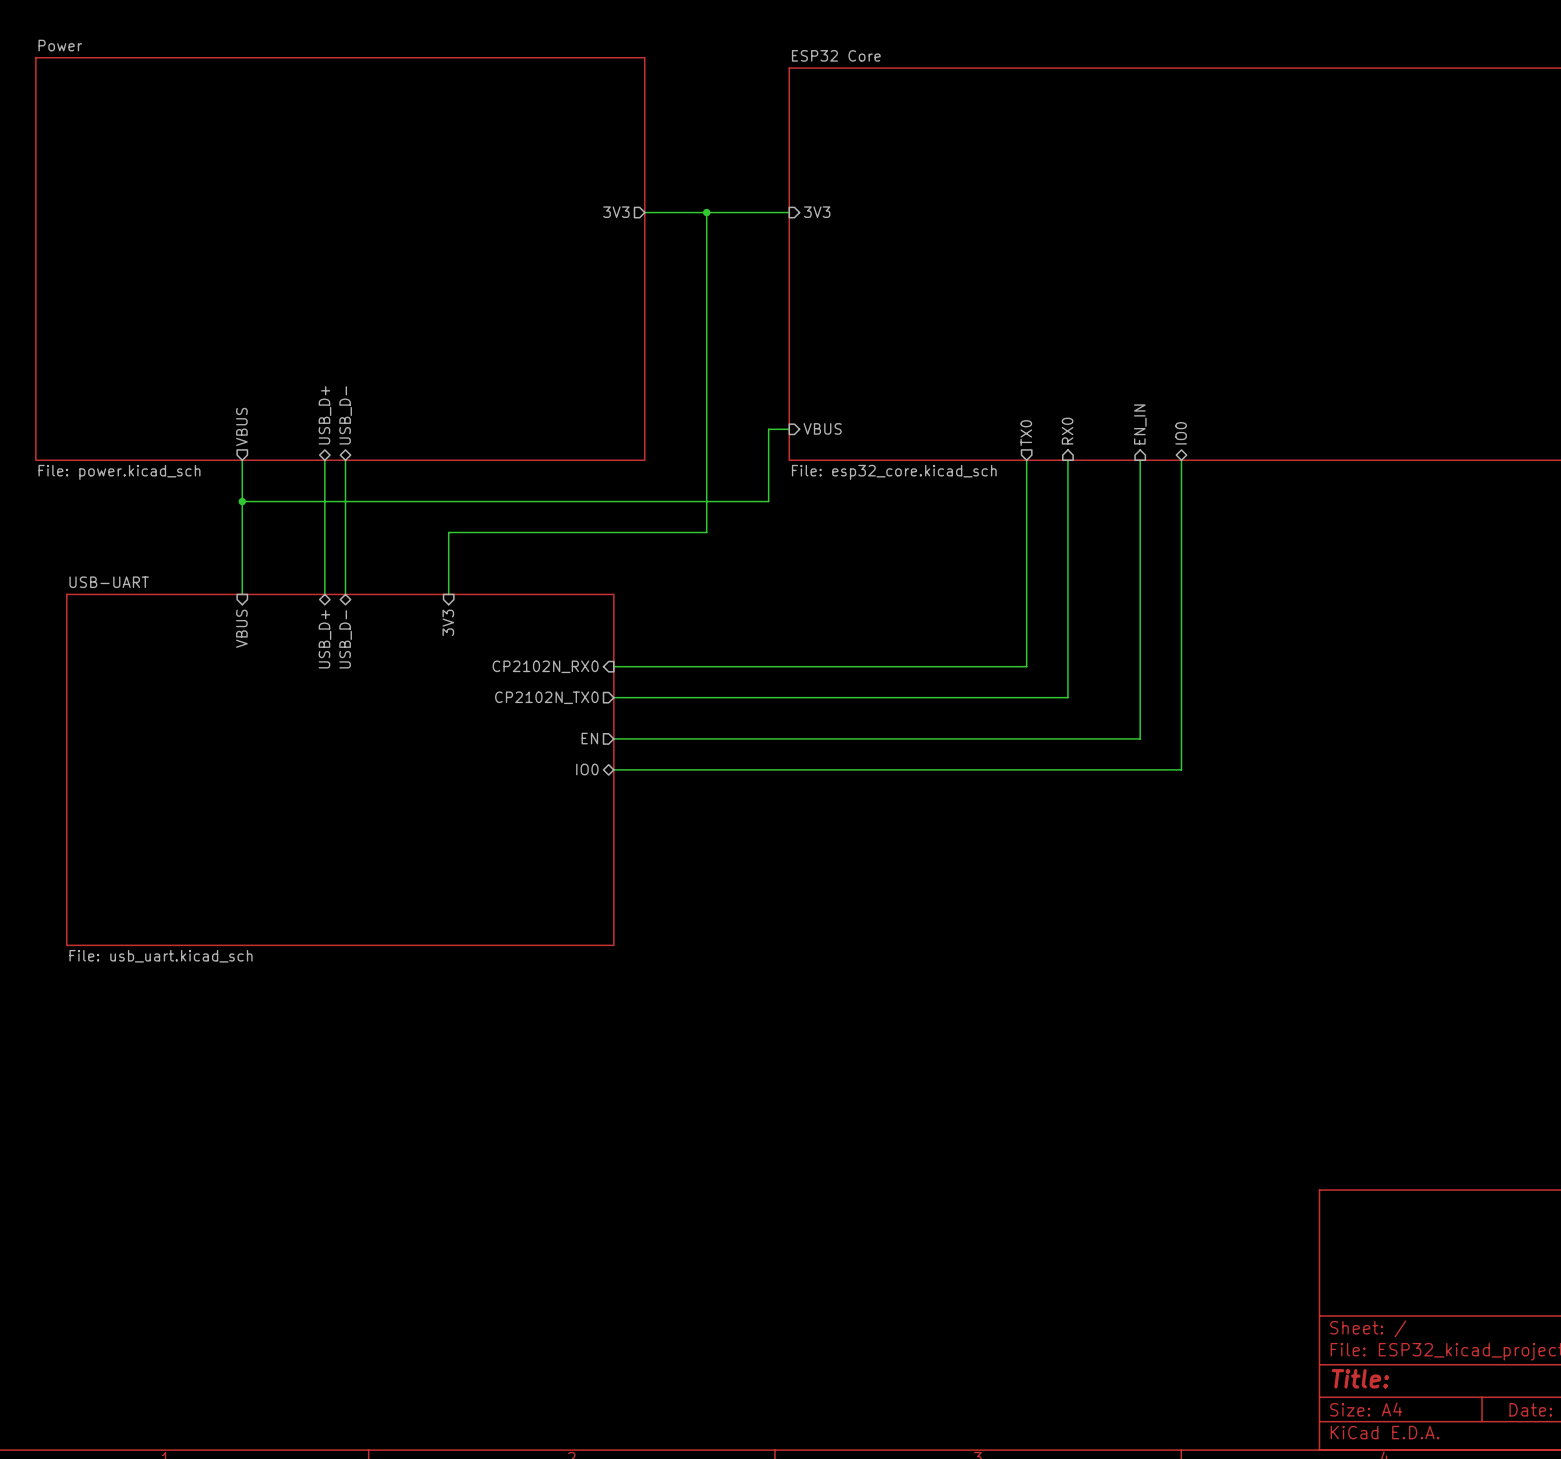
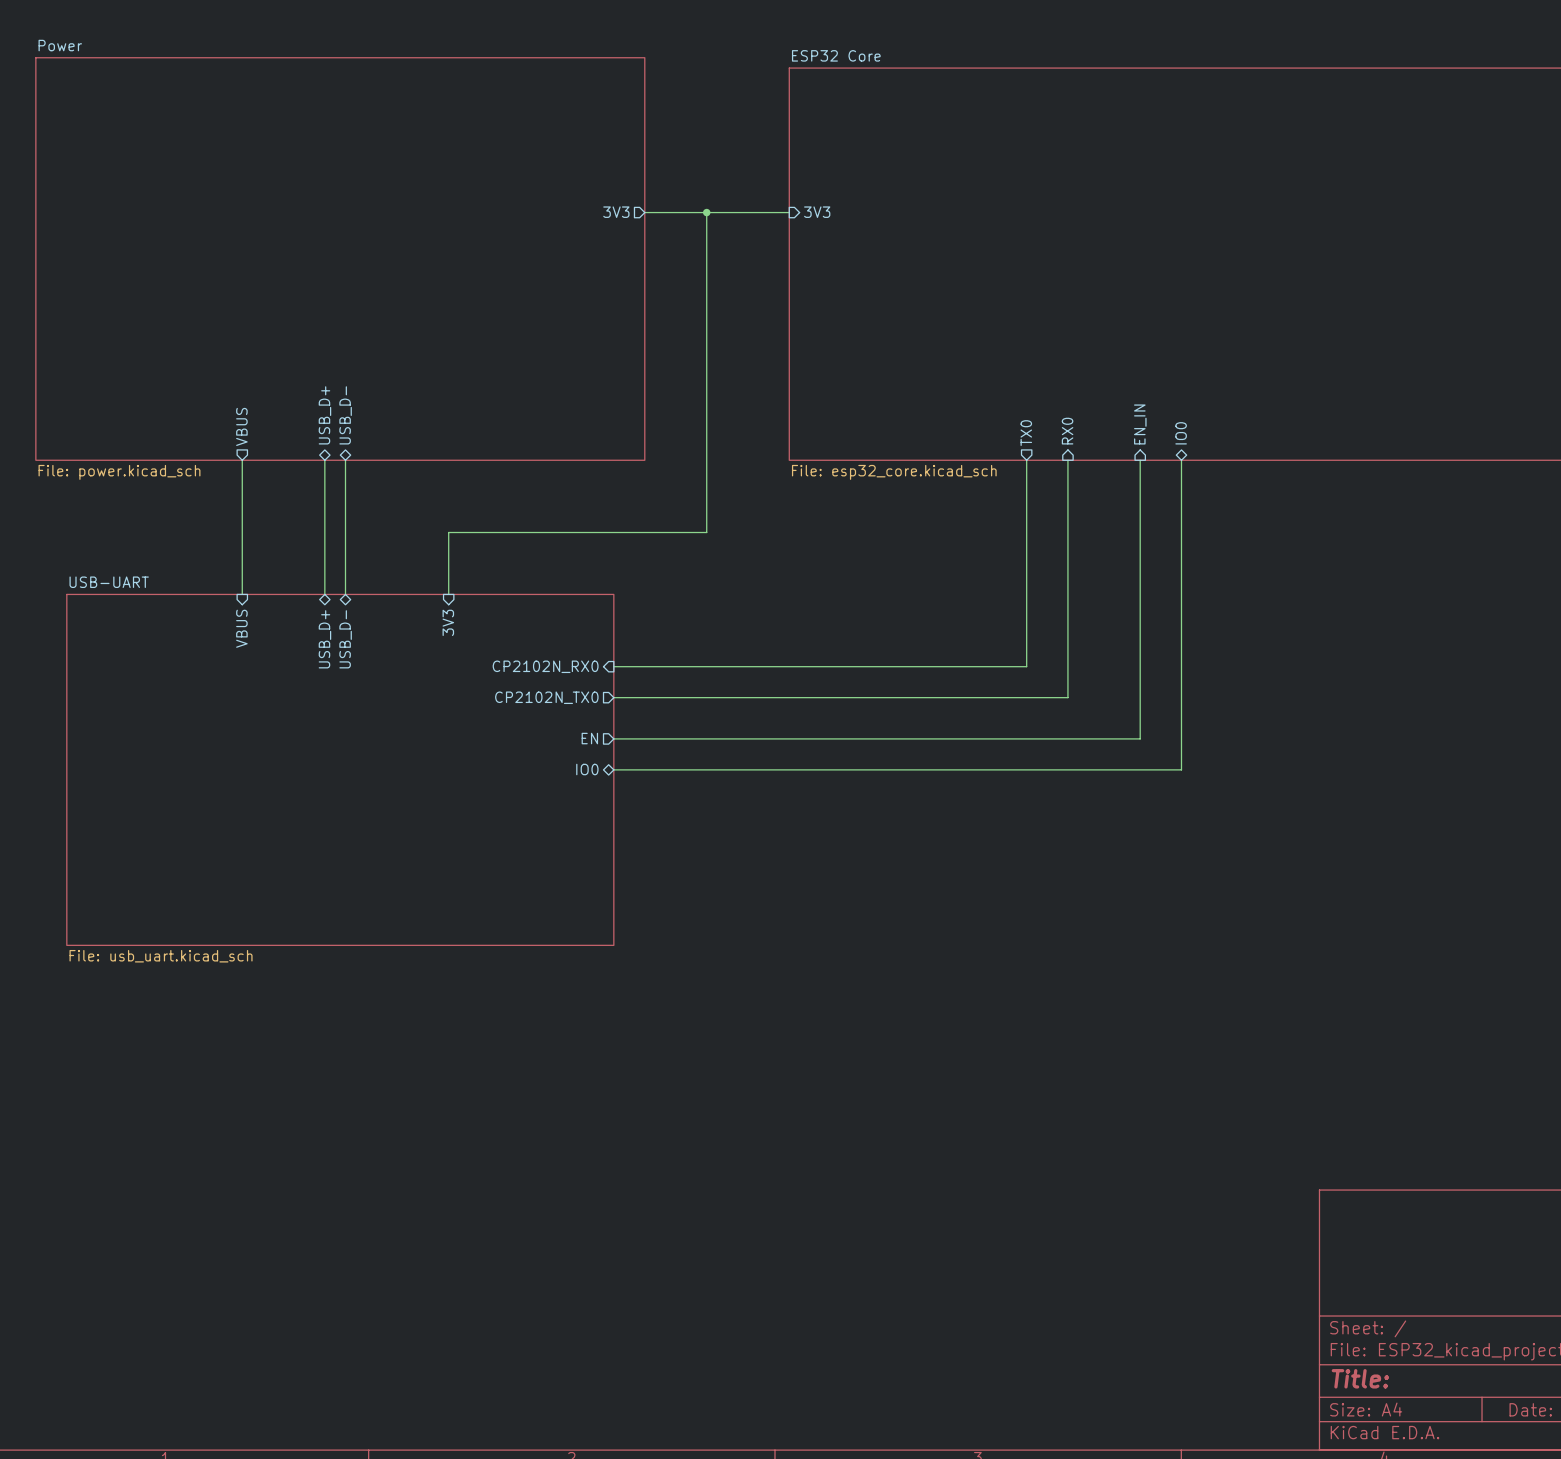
sheet pin: VBUS (822, 428) -> none
wire: (789, 429) (768, 429) (768, 501) (242, 501) -> none
junction: (242, 501) -> none

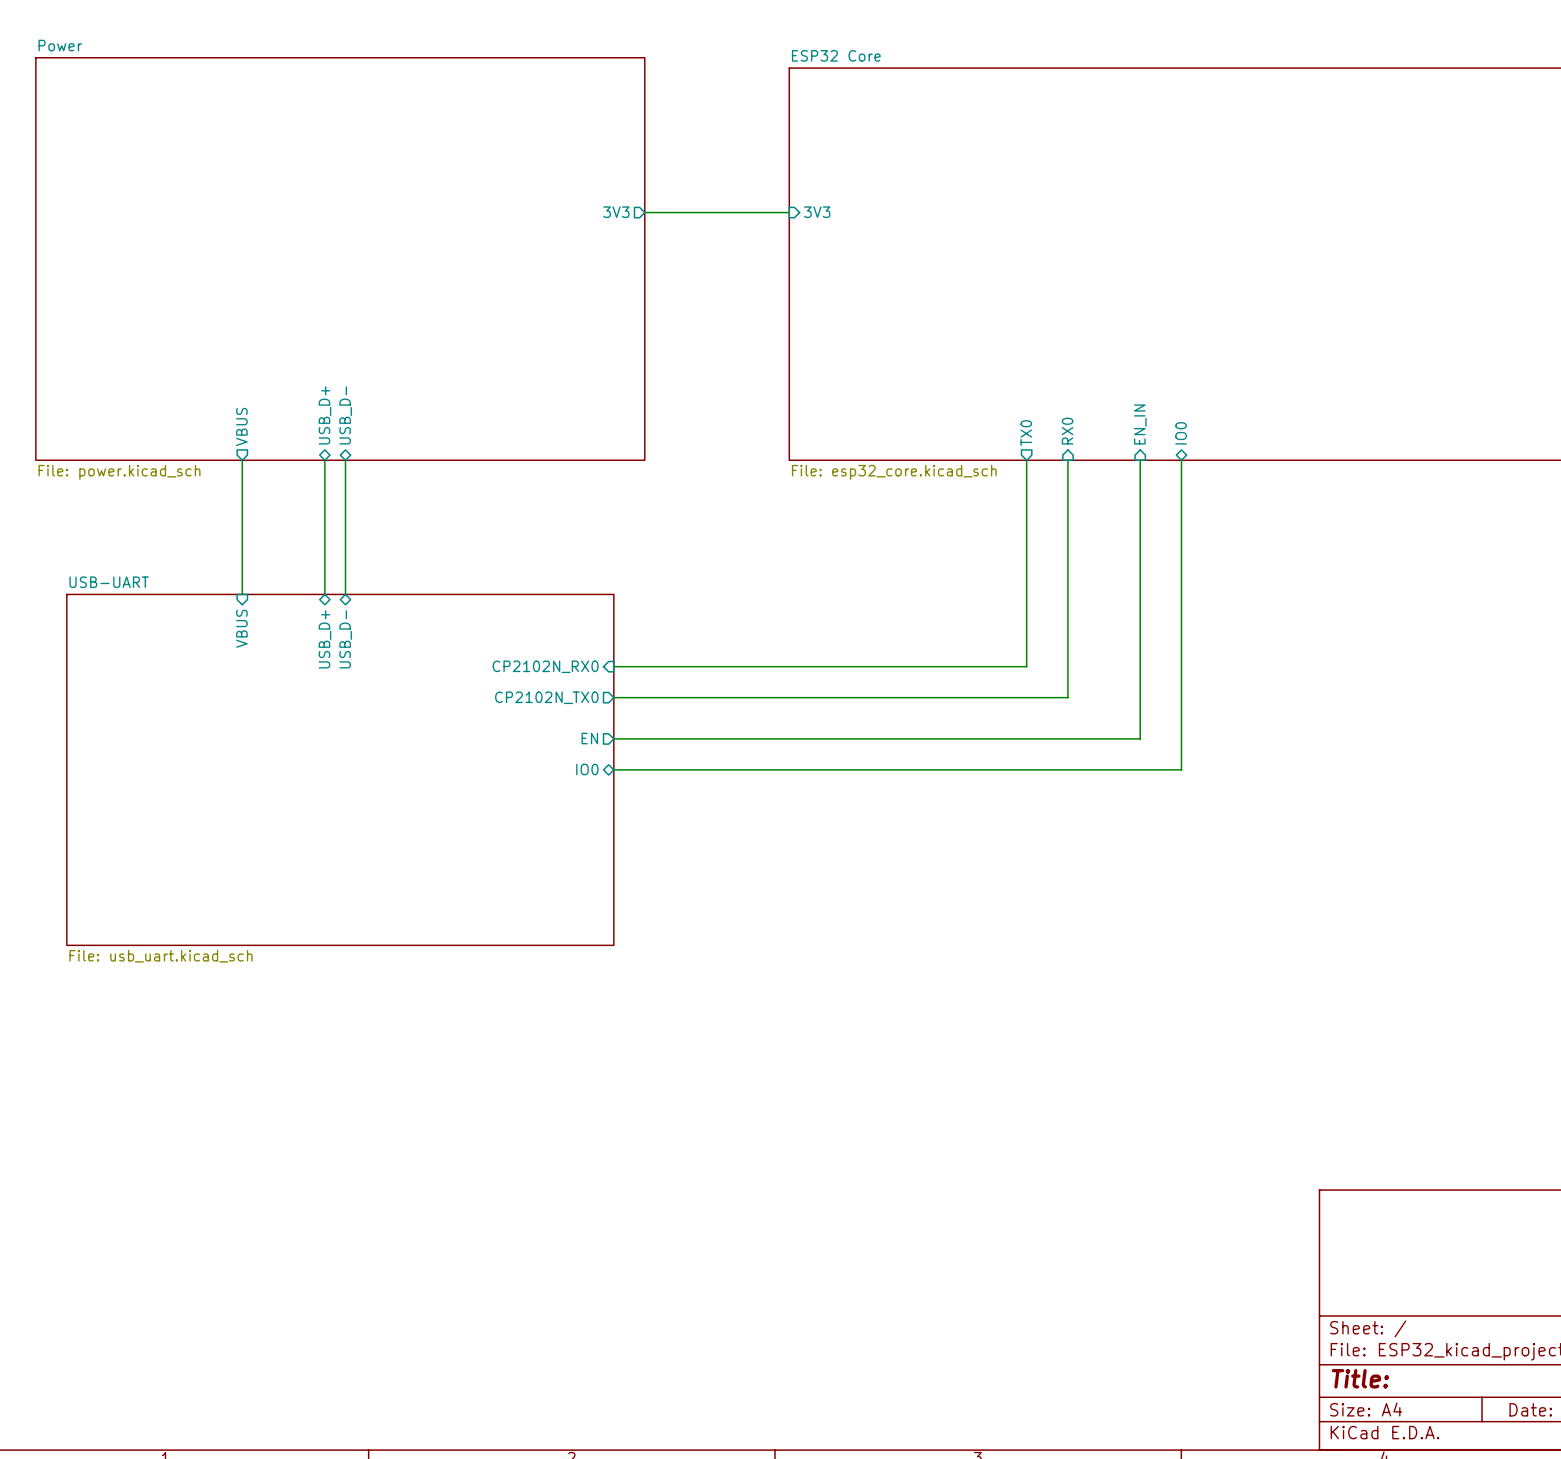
wire: (706, 212) (706, 532) (448, 532) (448, 594) -> none
junction: (706, 212) -> none
sheet pin: 3V3 (448, 622) -> none

